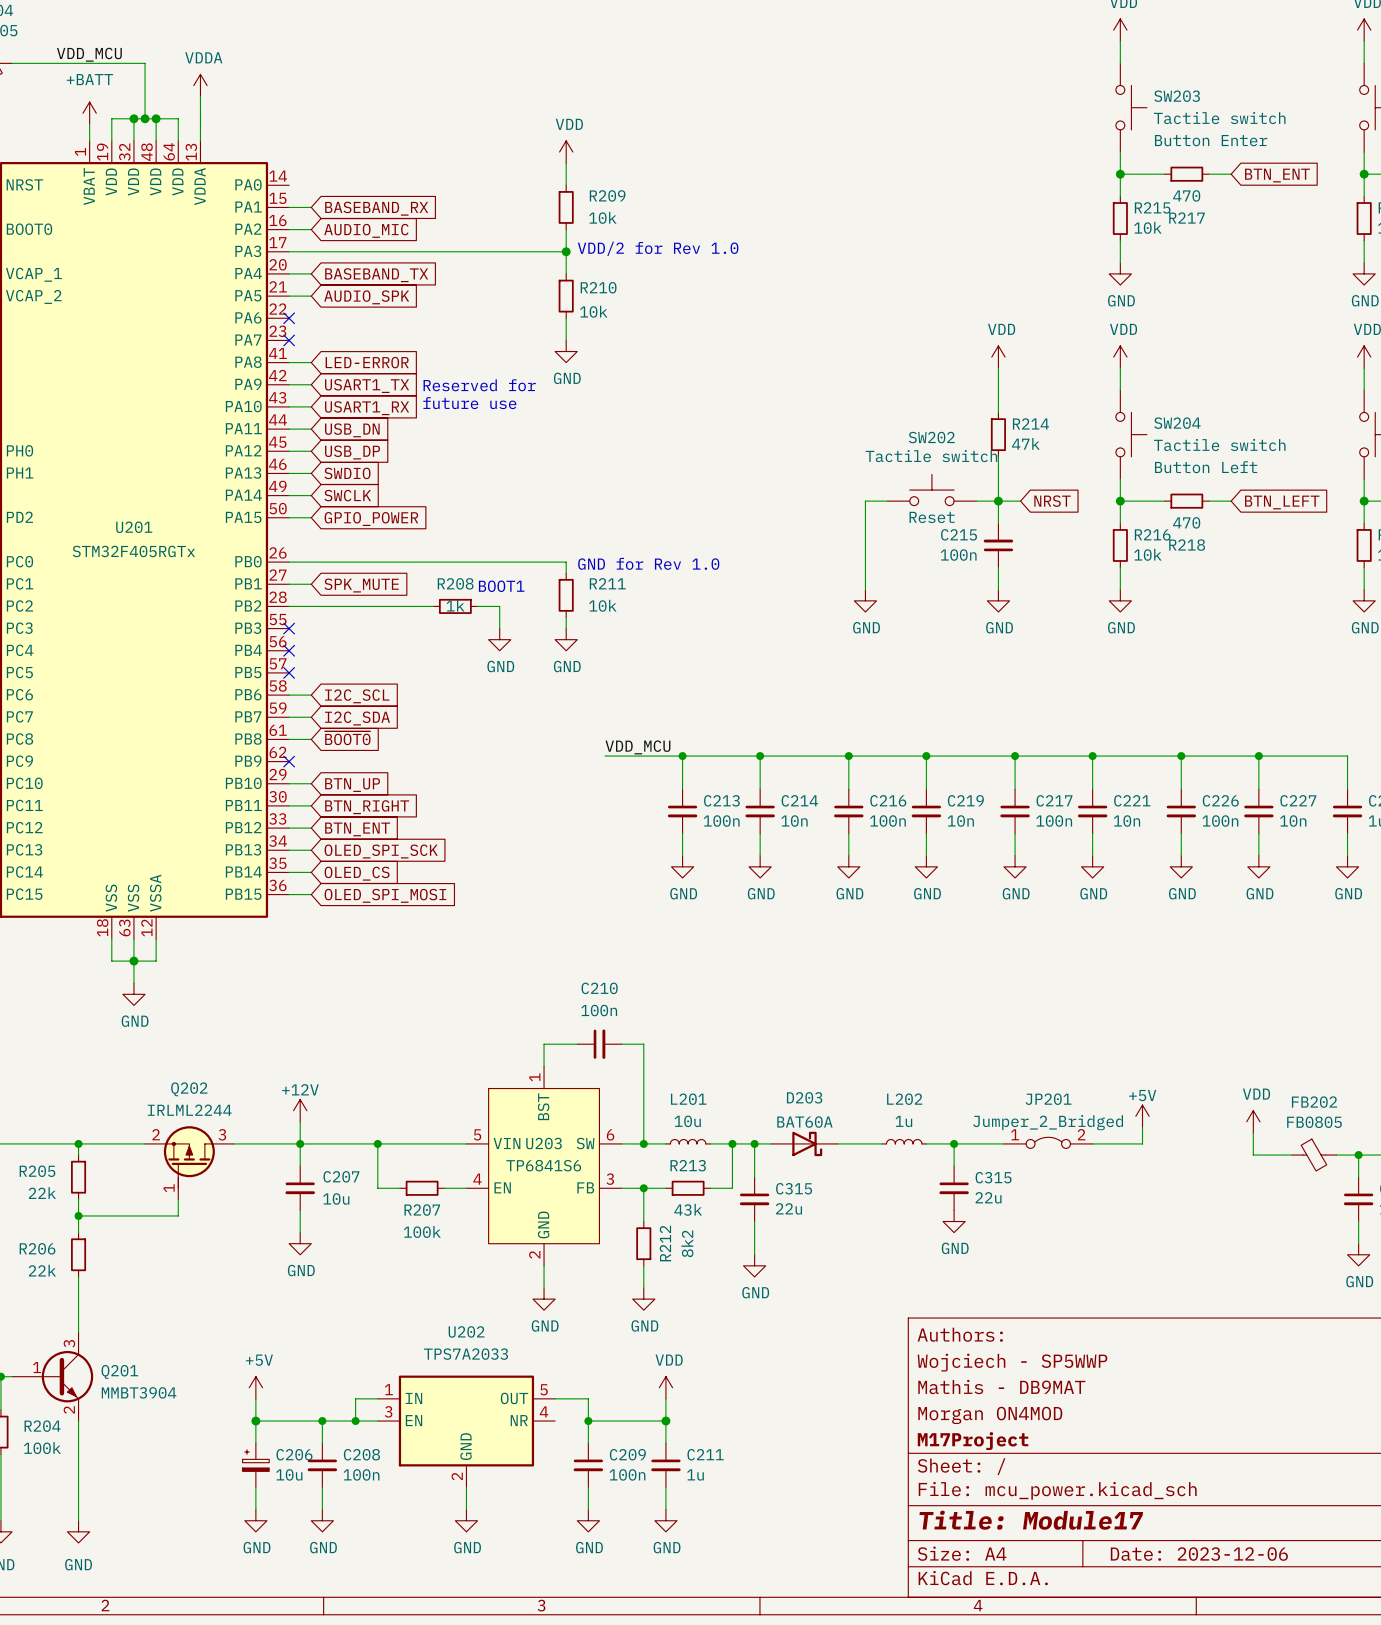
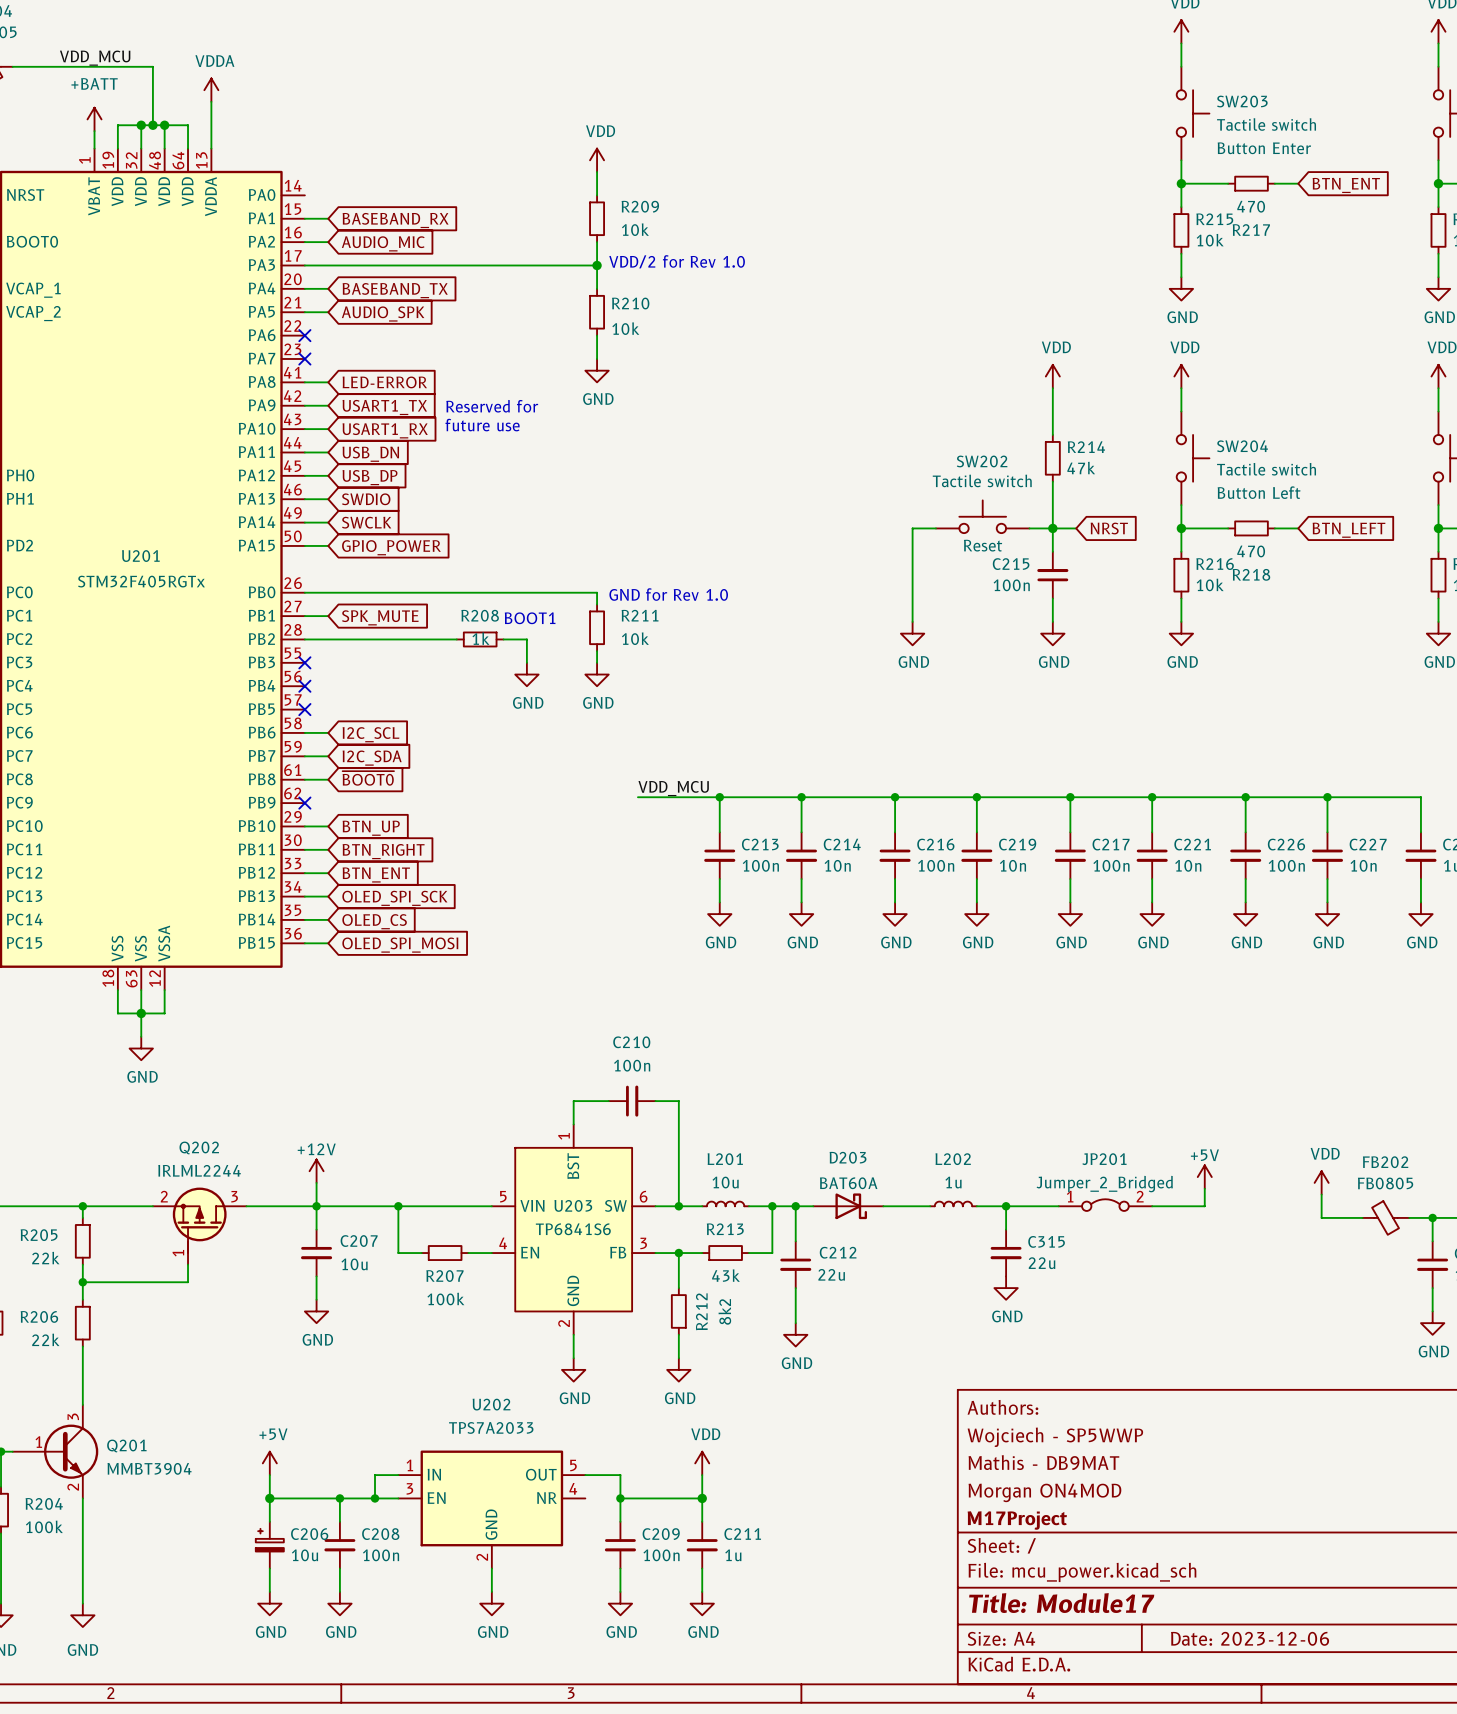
C315 name: C315 (794, 1188) -> C212 (838, 1252)

